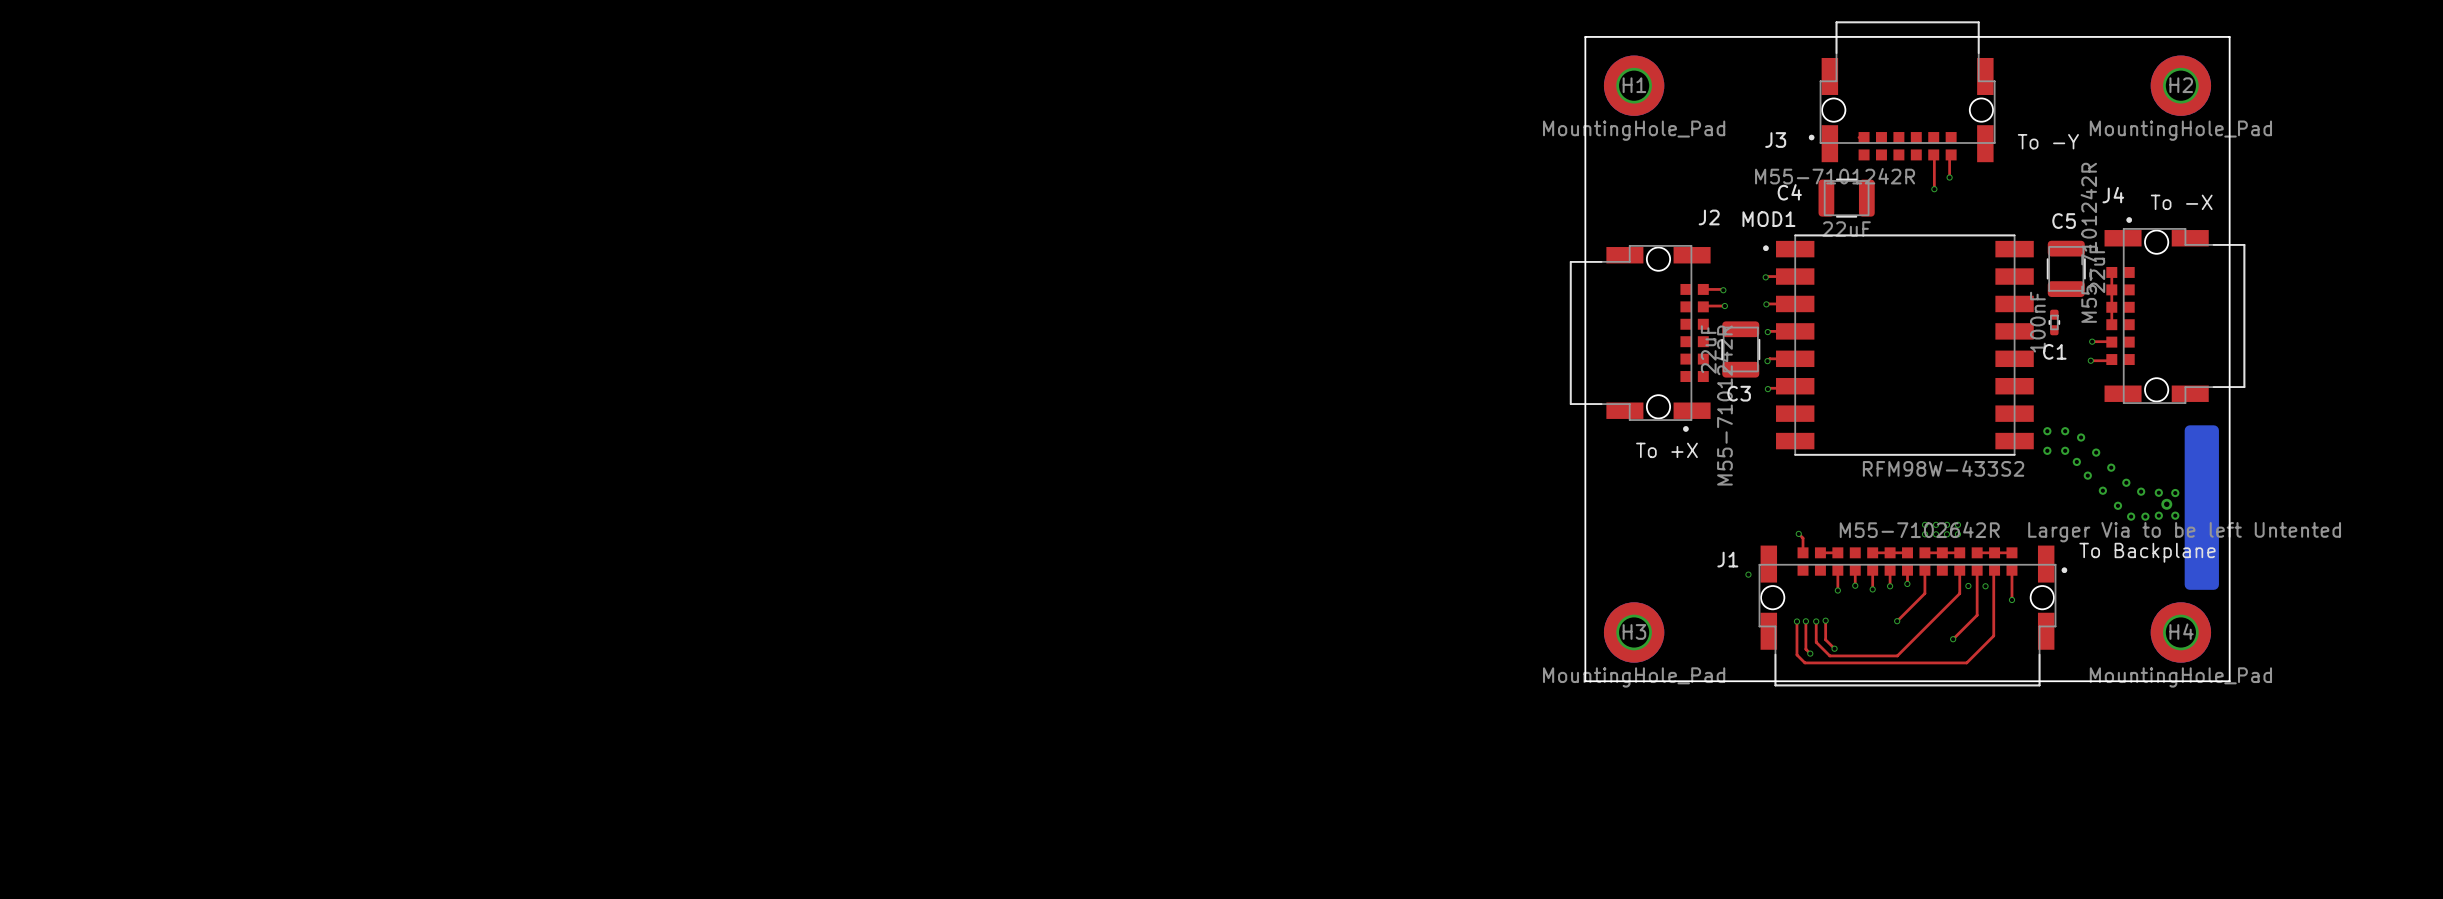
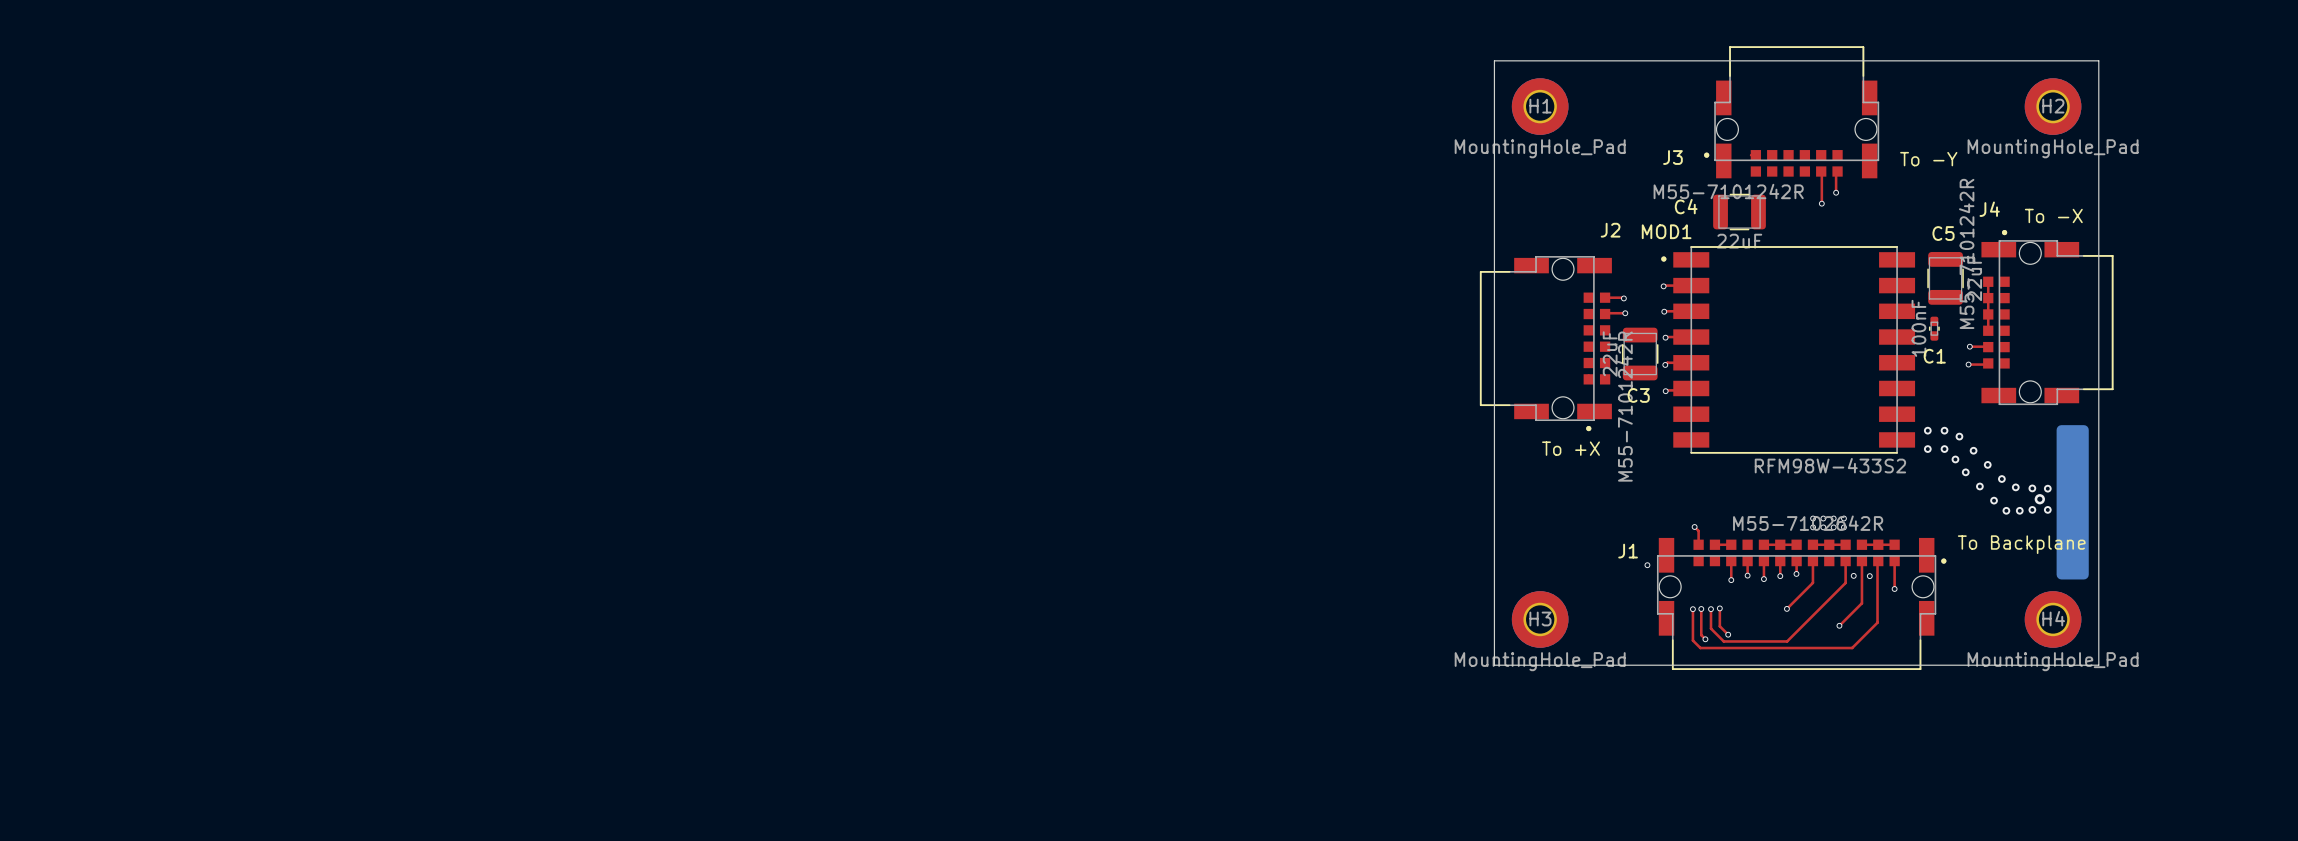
text: Larger Via to be left Untented (2184, 532) -> none

